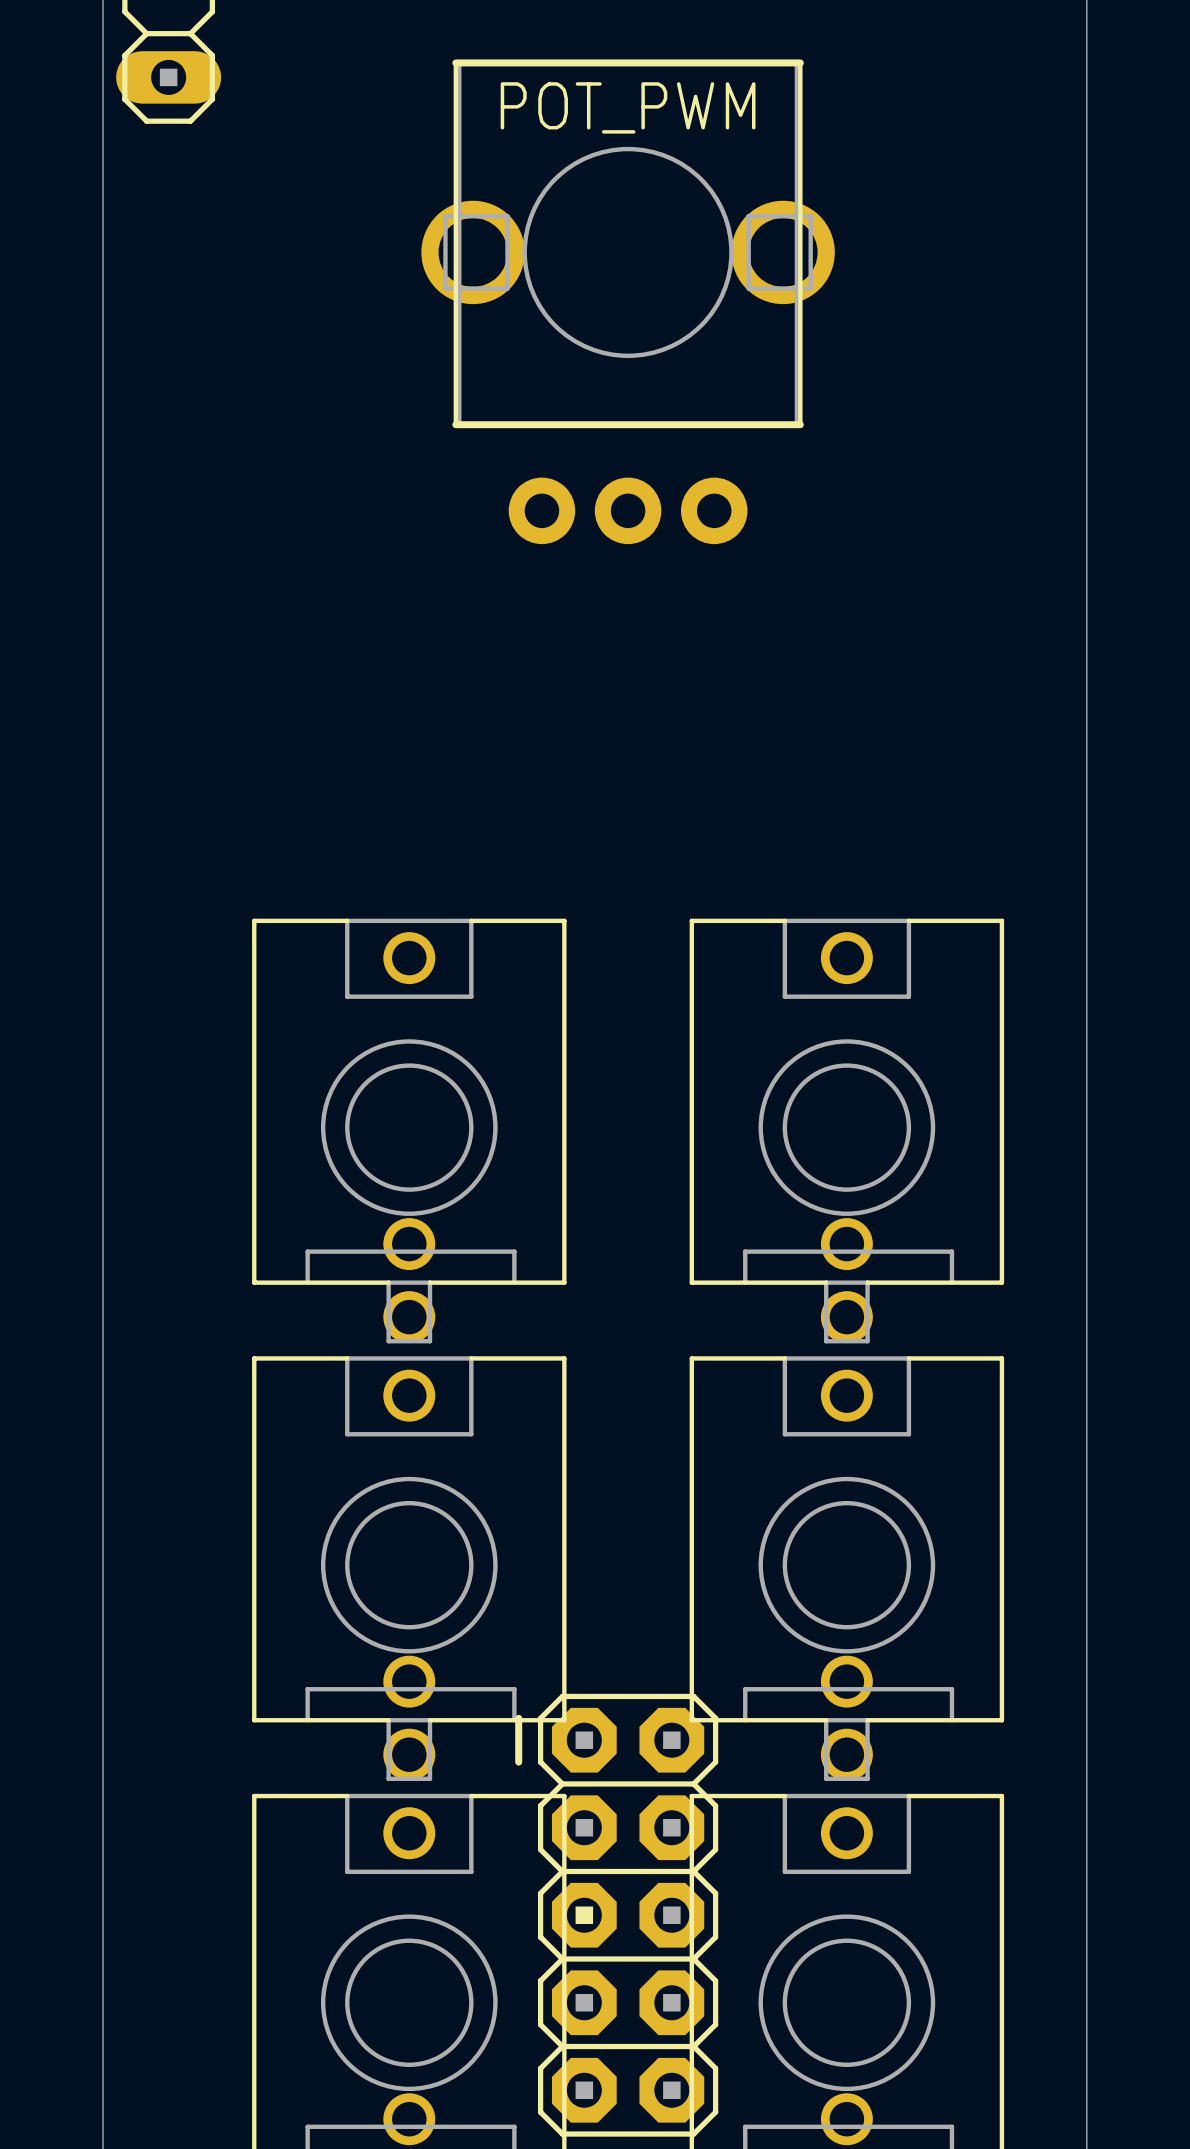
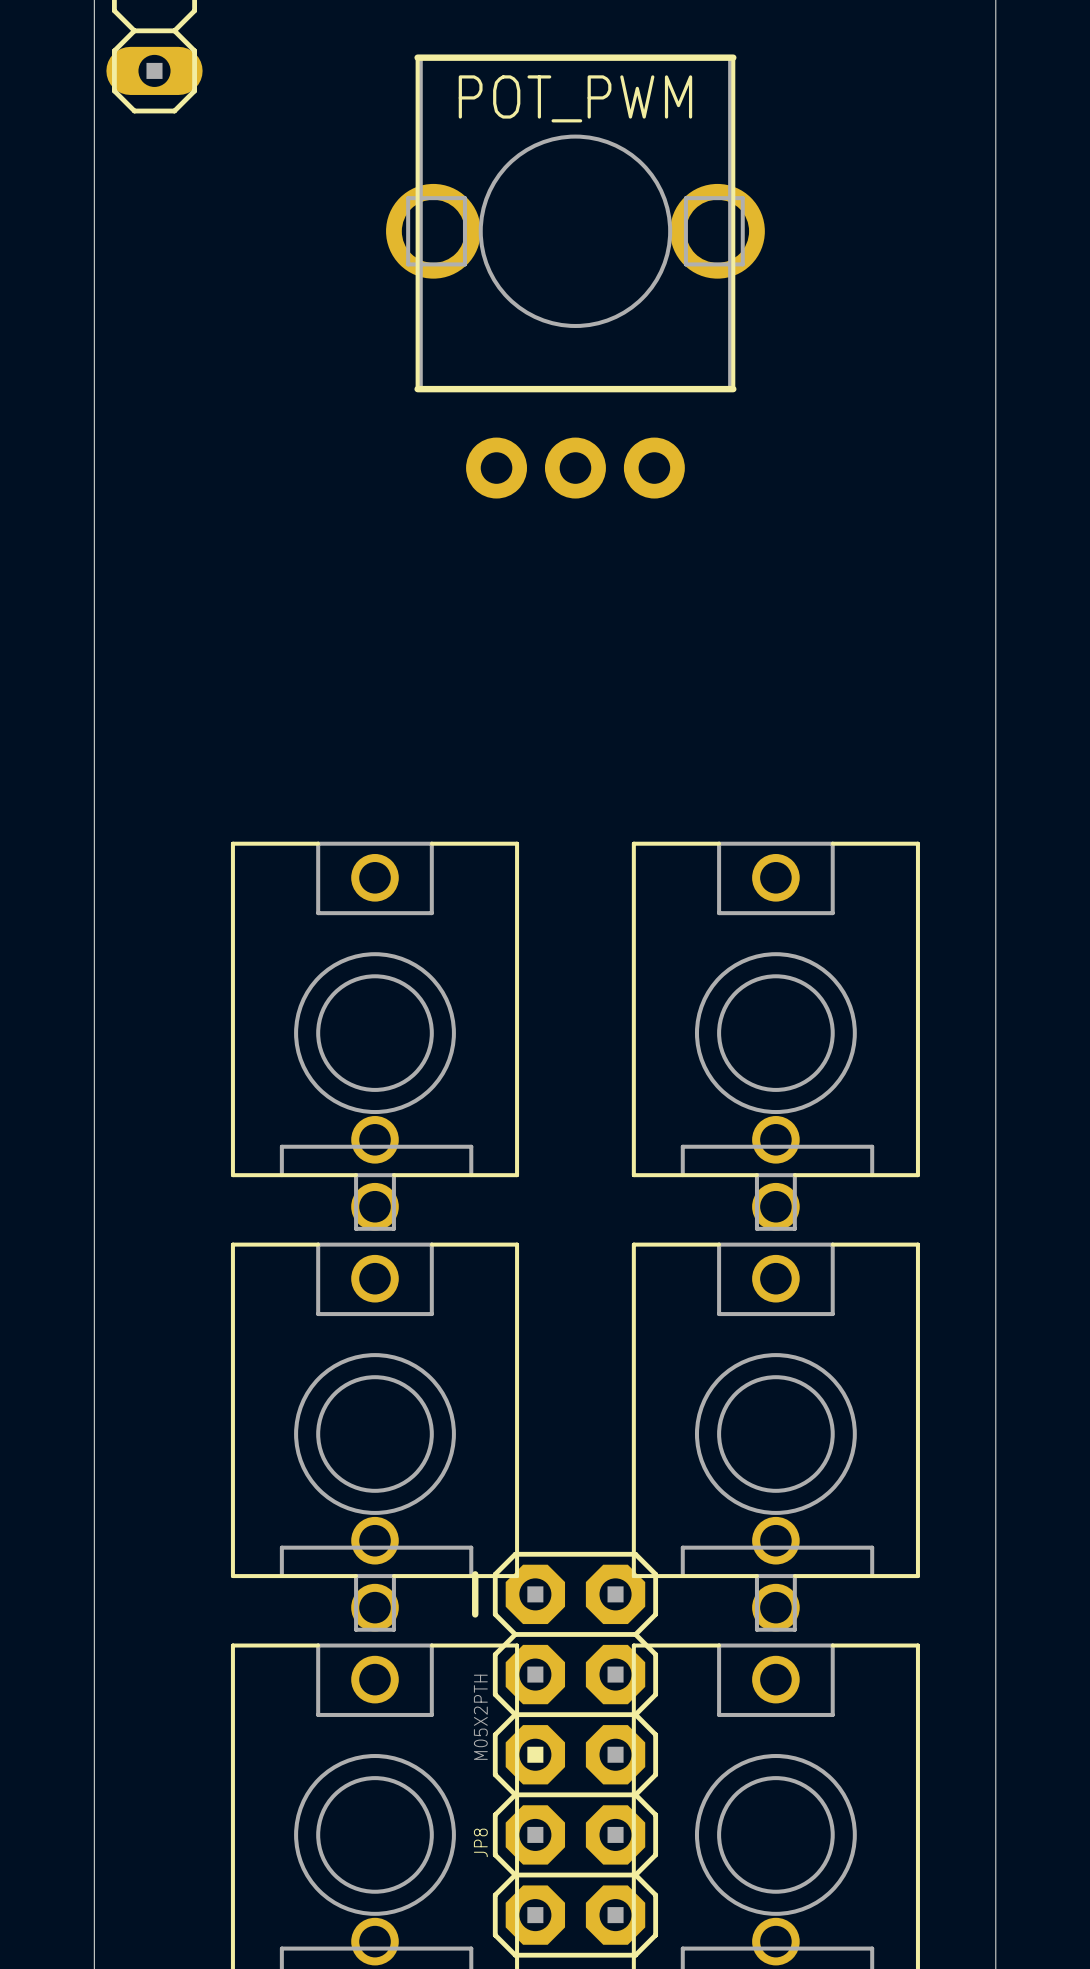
JP8 value: none -> M05X2PTH (480, 1717)
JP8 name: none -> JP8 (480, 1842)

